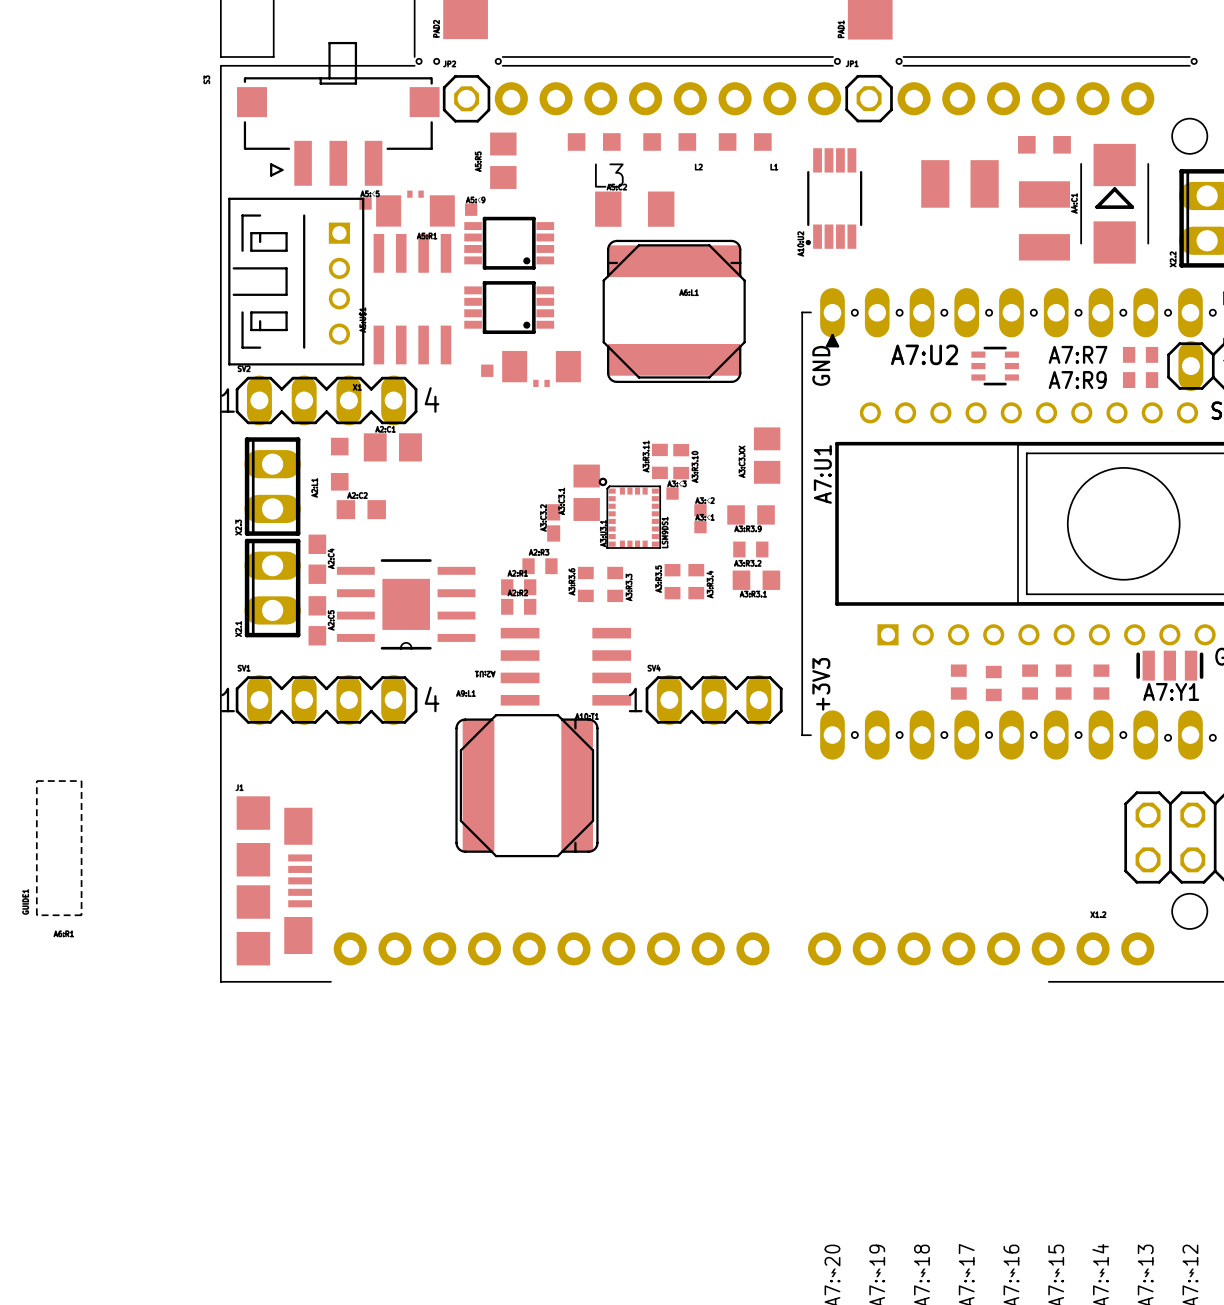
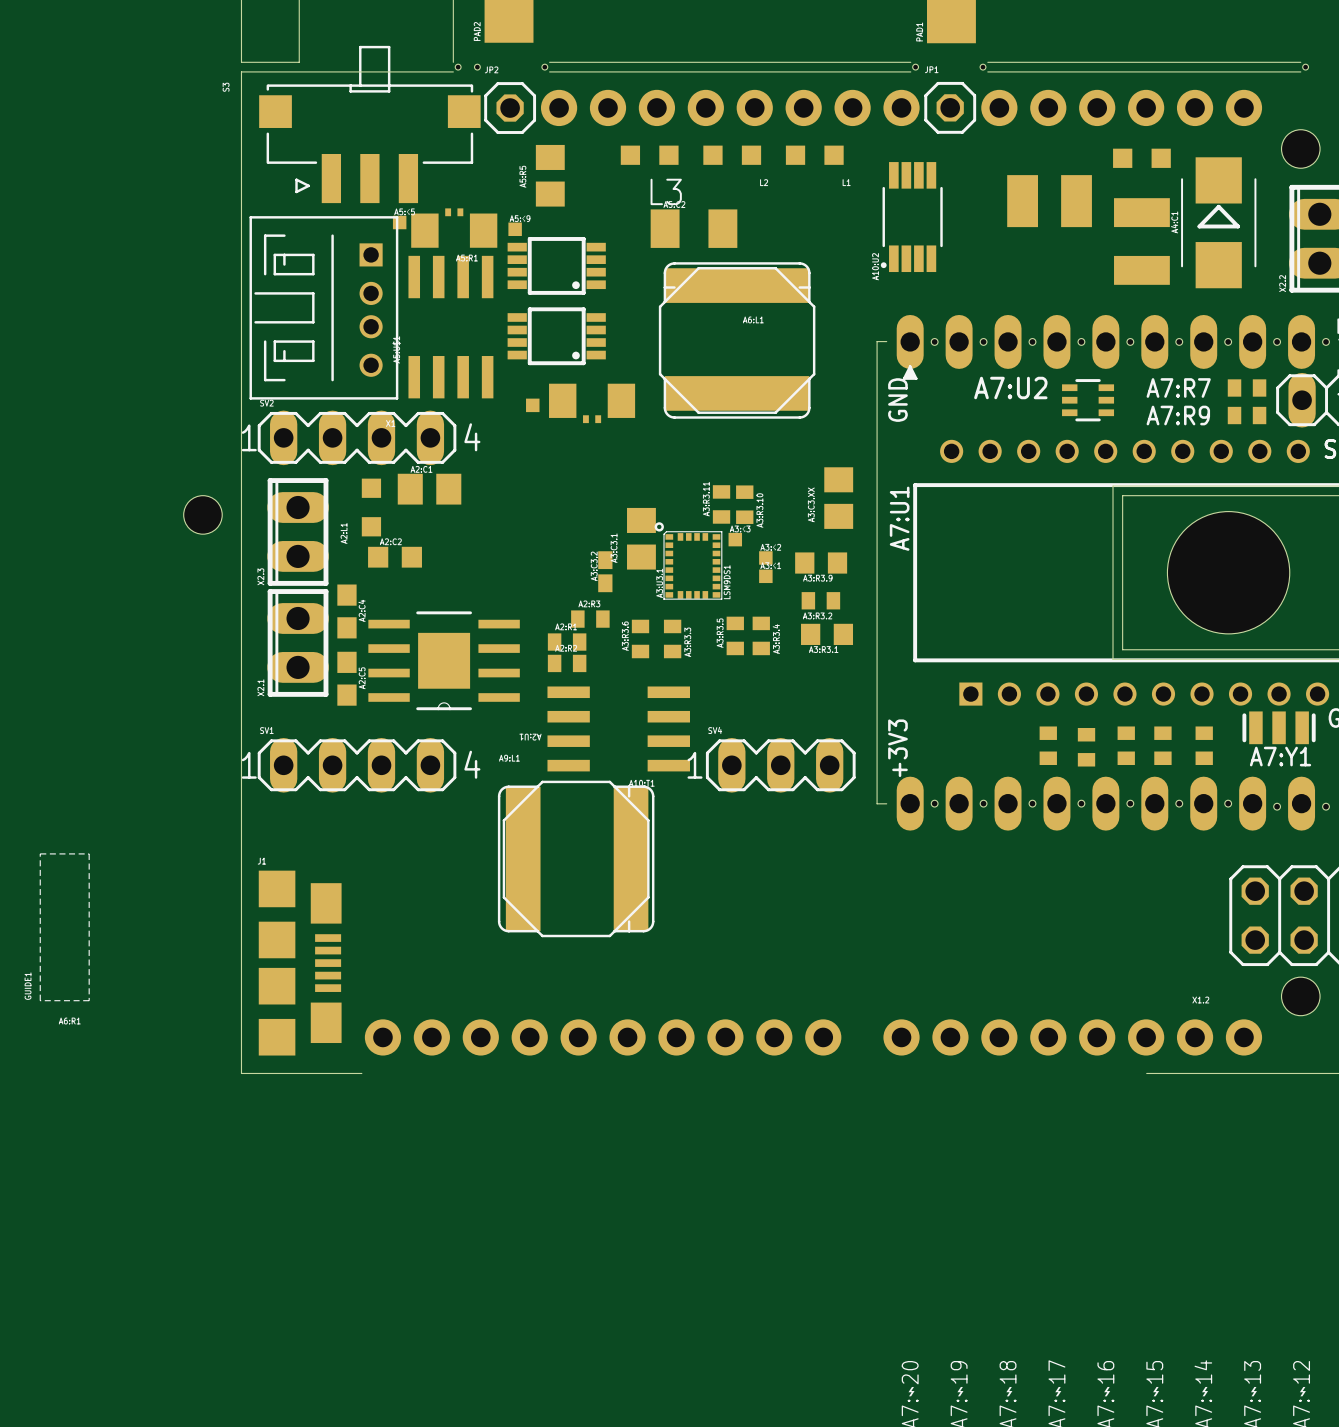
hole: none -> (202, 514)

